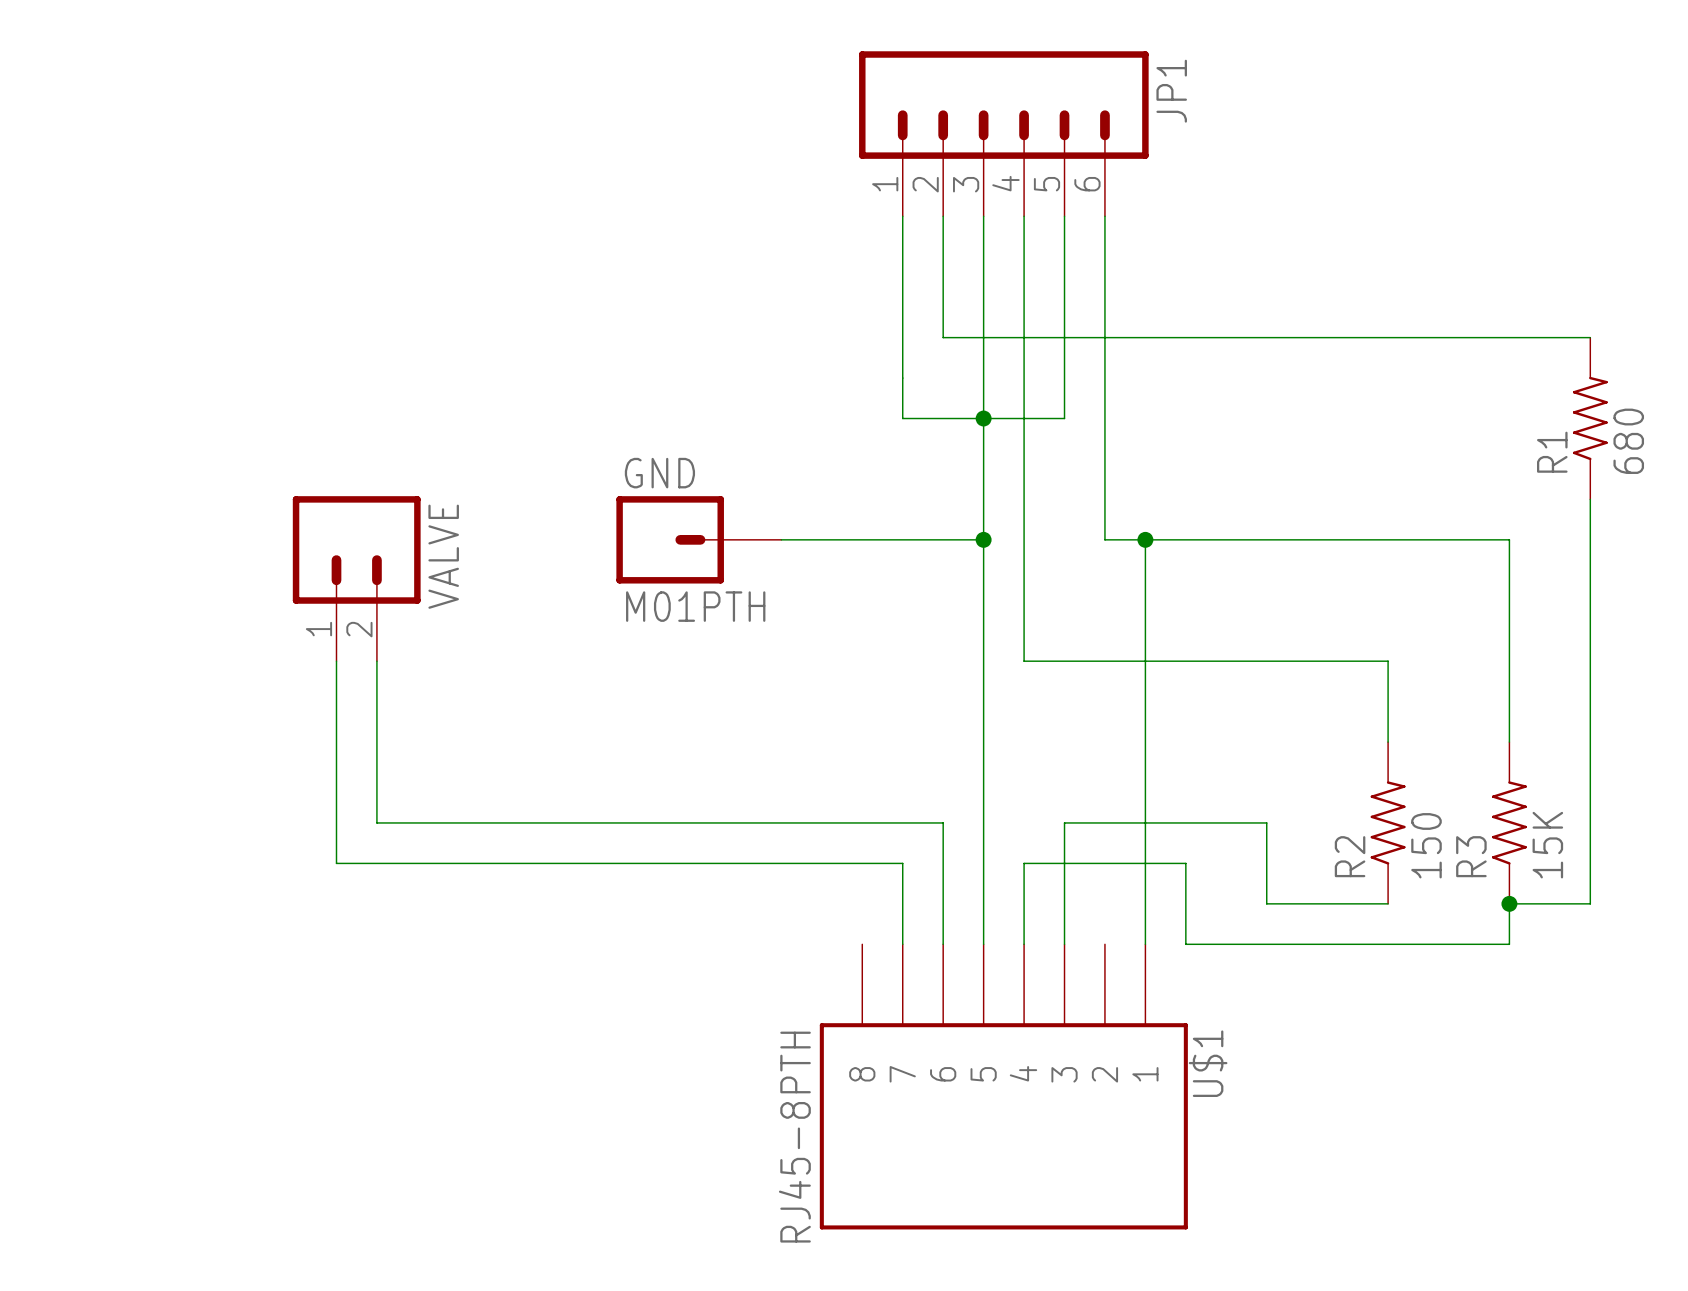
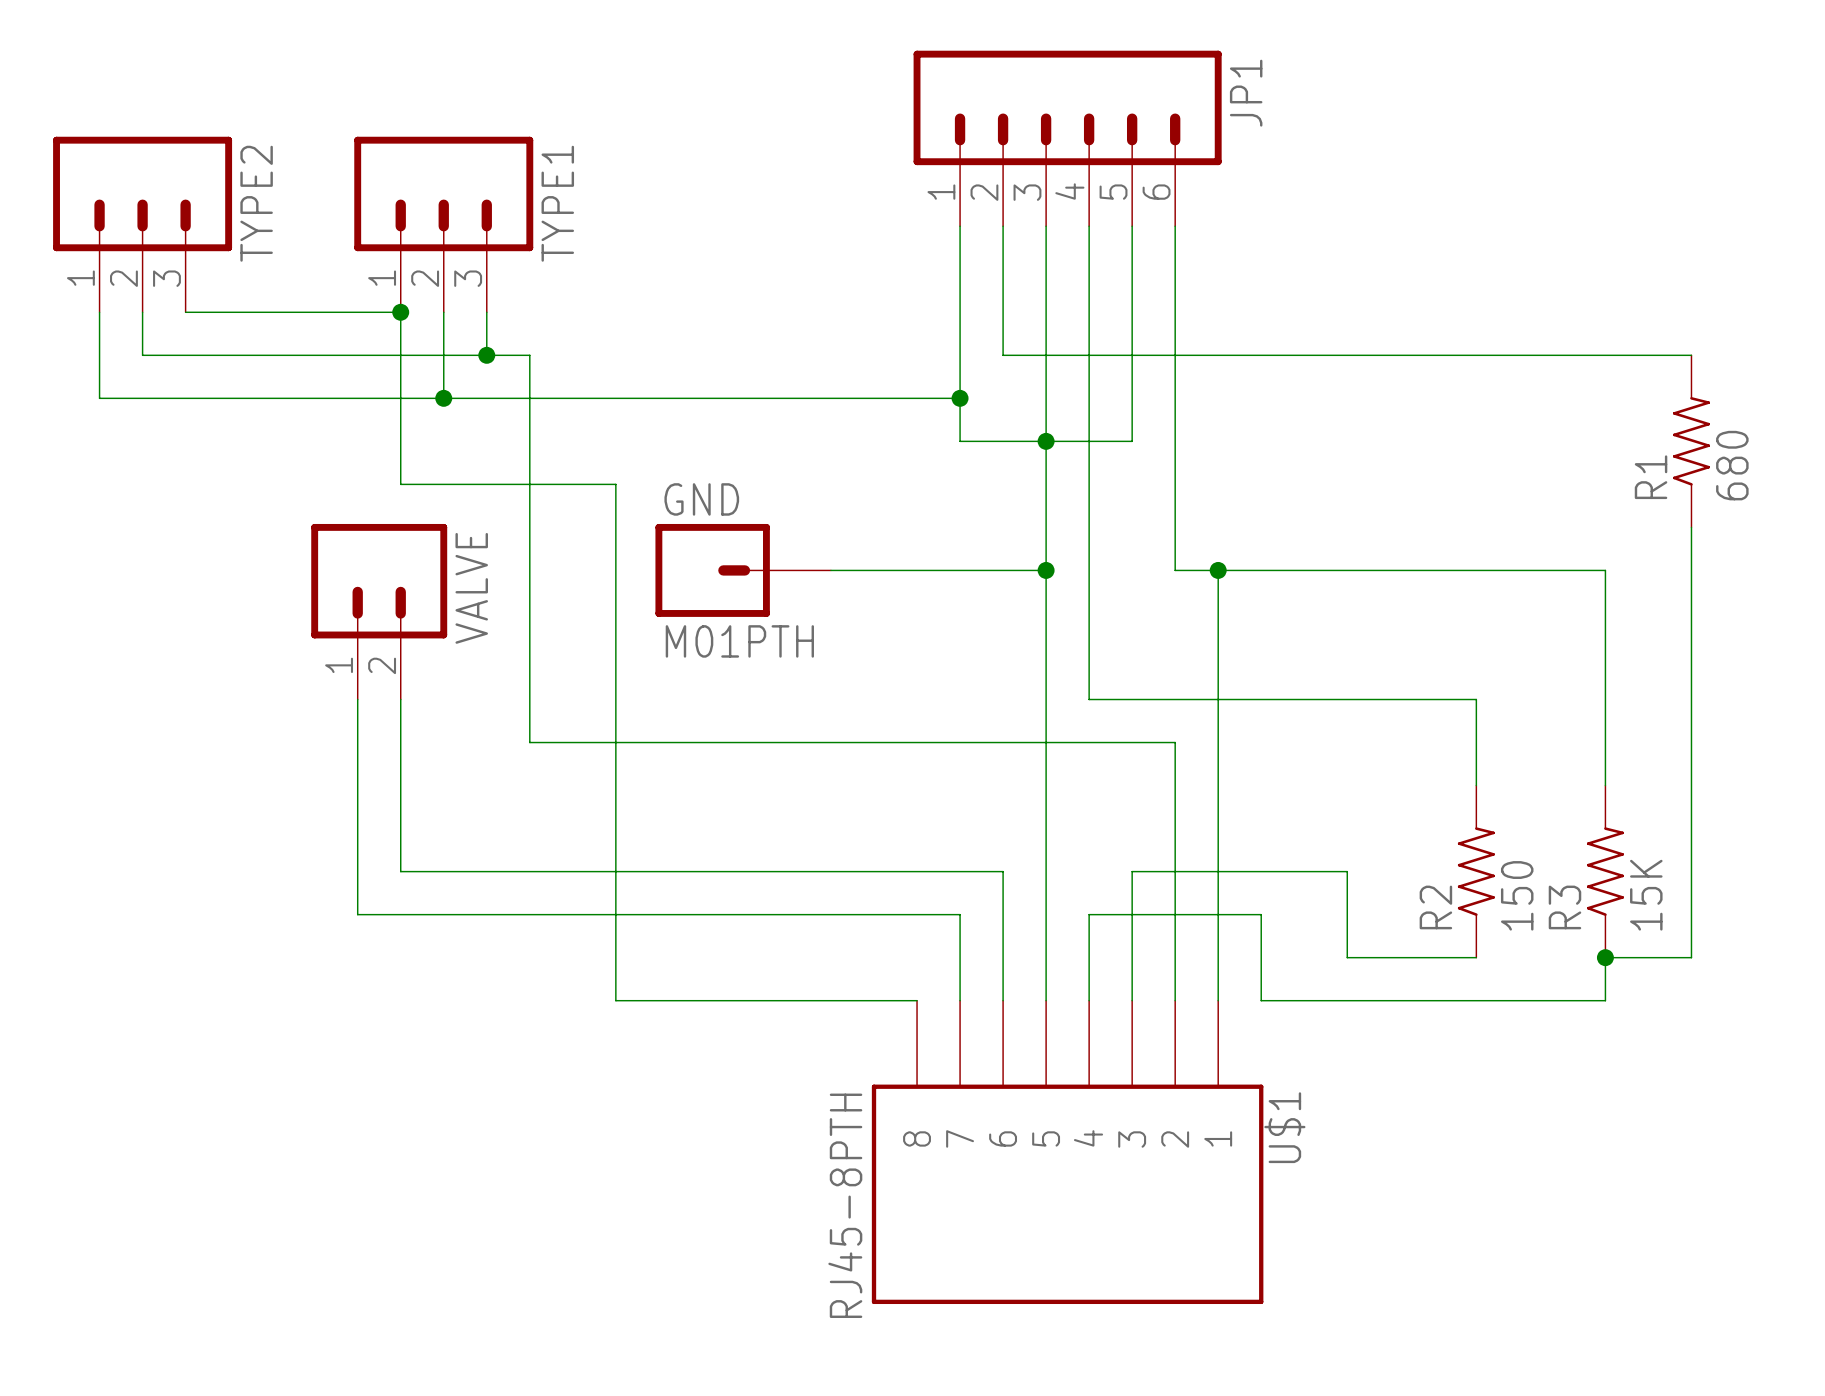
TYPE2: none -> (142, 224)
TYPE1: none -> (443, 224)
wire: none -> (99, 312) (99, 398) (960, 398)
wire: none -> (142, 312) (142, 355) (529, 355) (529, 742) (1175, 742) (1175, 1000)
wire: none -> (185, 312) (400, 312) (400, 484) (615, 484) (615, 1000) (917, 1000)
junction: none -> (400, 312)
wire: none -> (443, 312) (443, 398)
wire: none -> (486, 312) (486, 355)
junction: none -> (486, 355)
junction: none -> (443, 398)
junction: none -> (960, 398)

